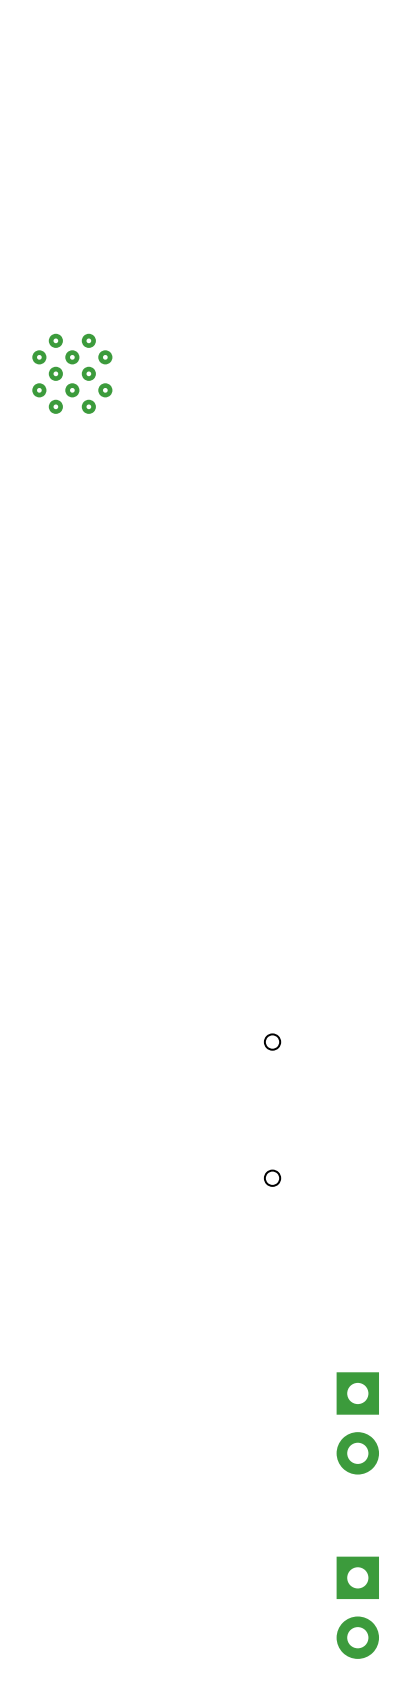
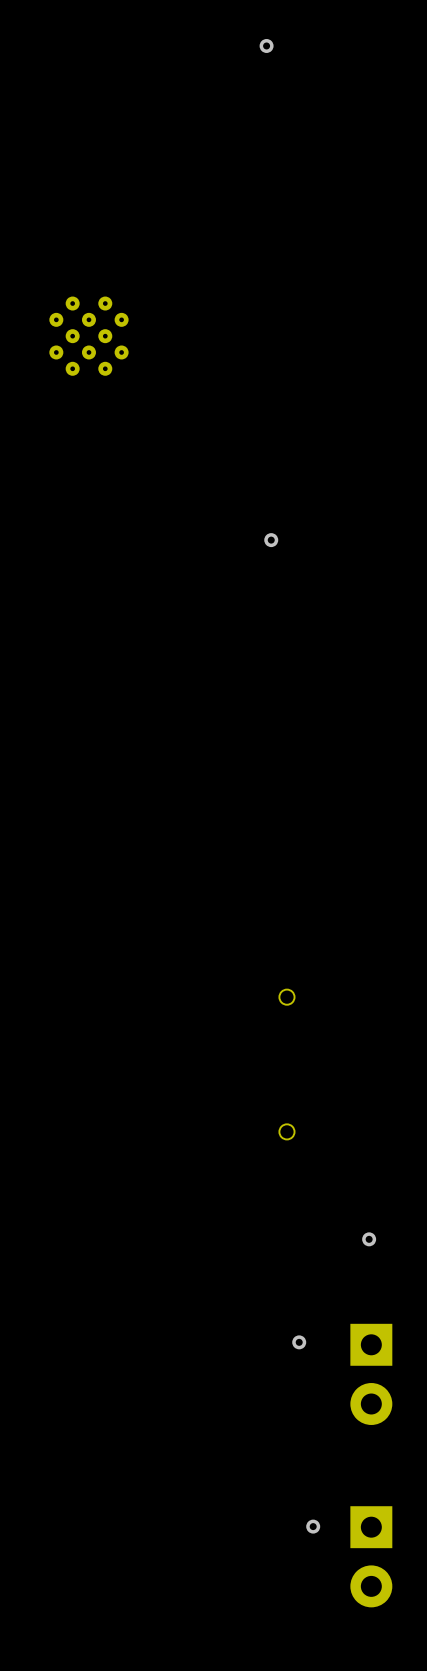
via: none -> (266, 45)
via: none -> (271, 540)
via: none -> (369, 1239)
via: none -> (299, 1342)
via: none -> (313, 1526)

